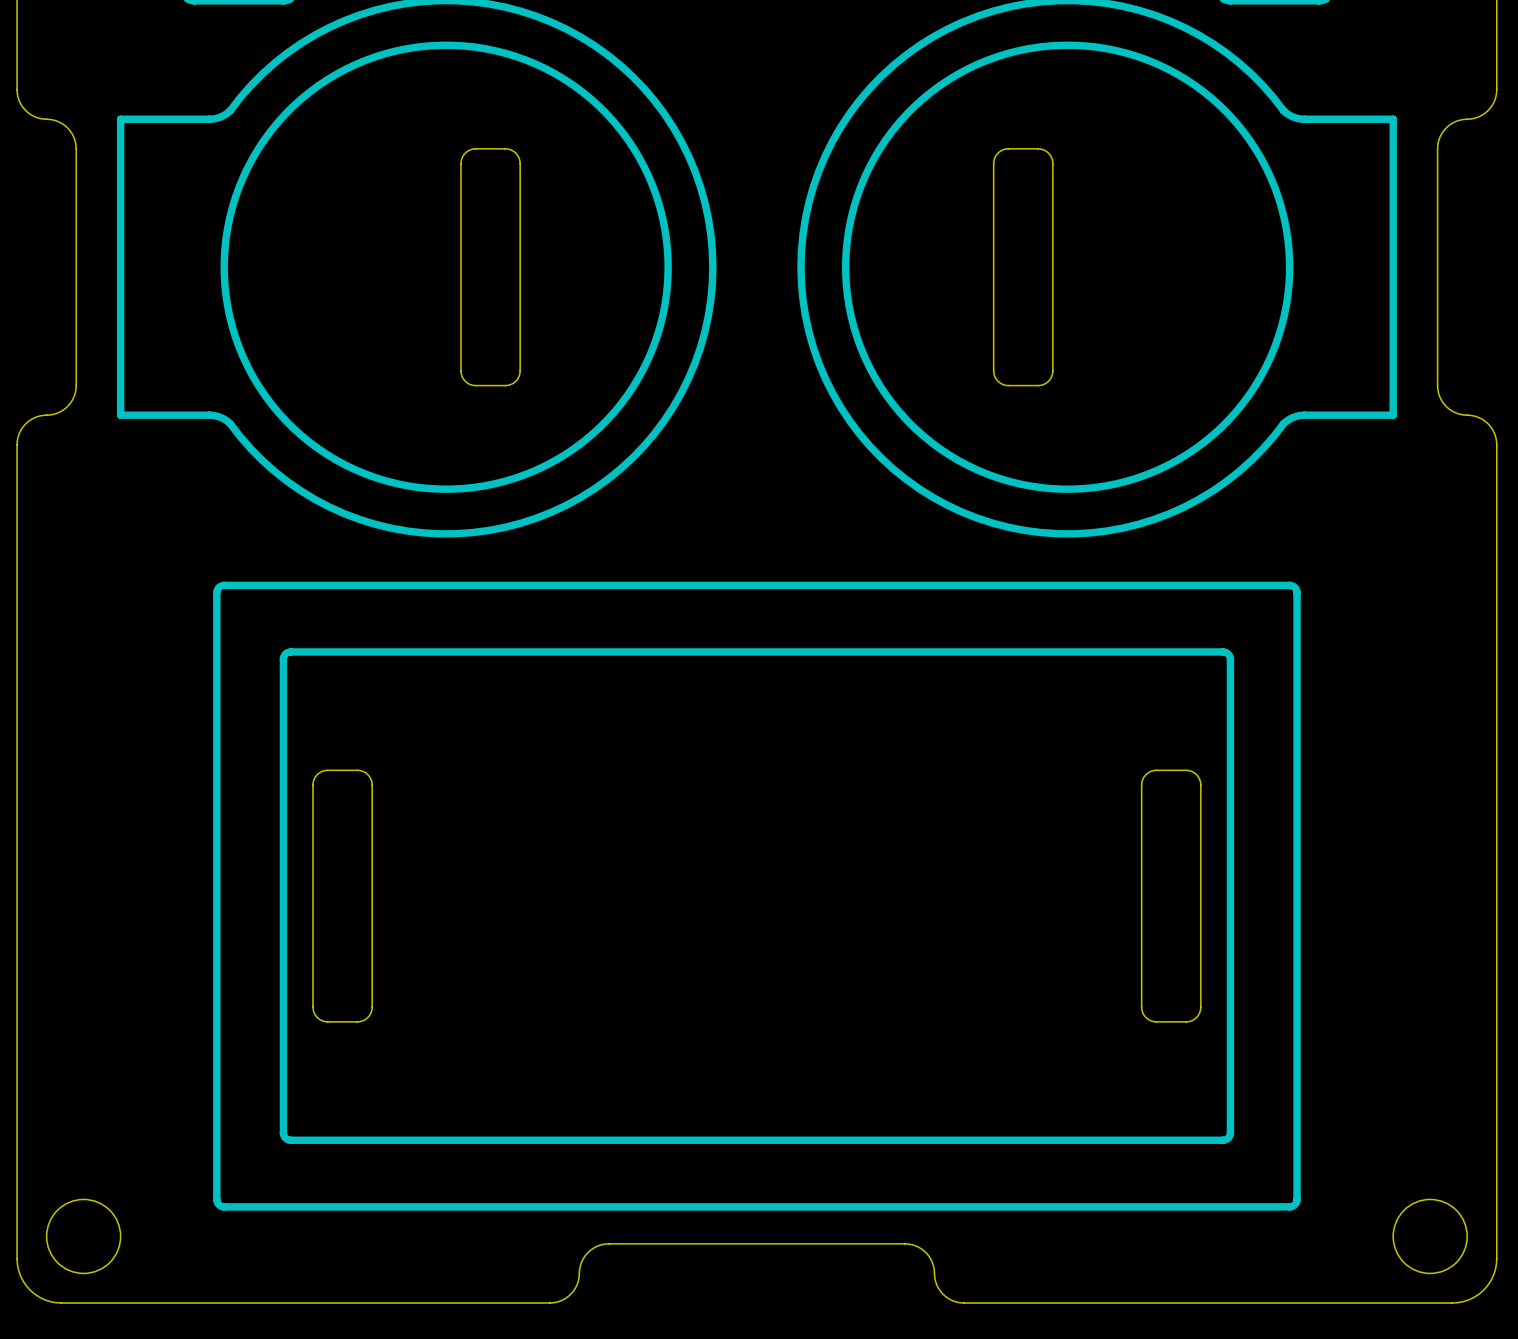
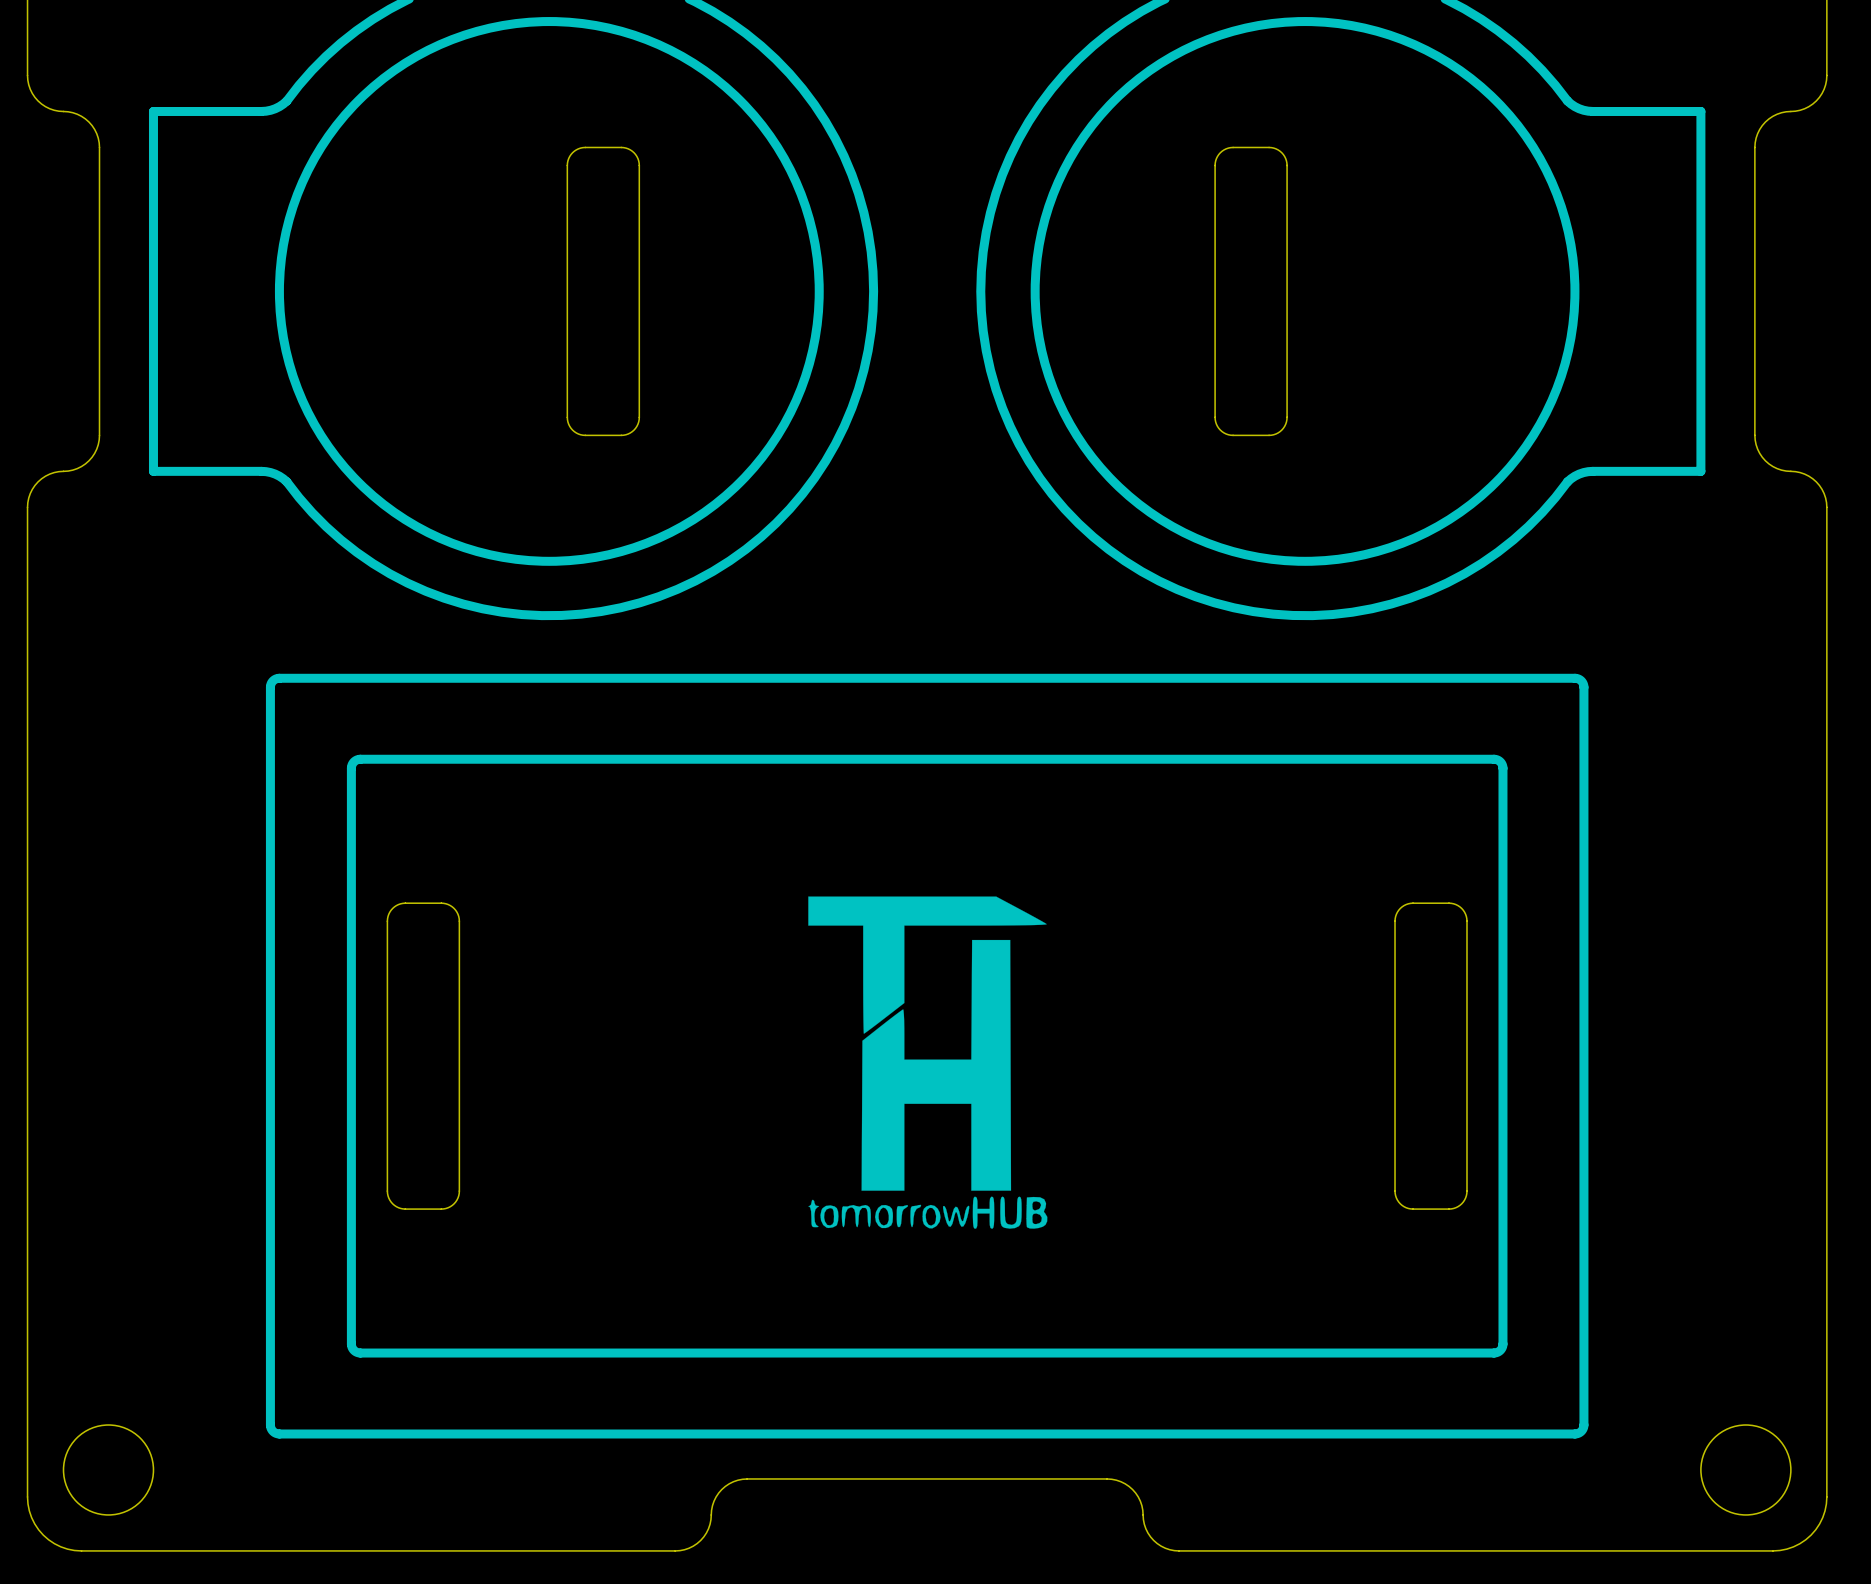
drawing: none -> [808, 896, 1048, 1229]

